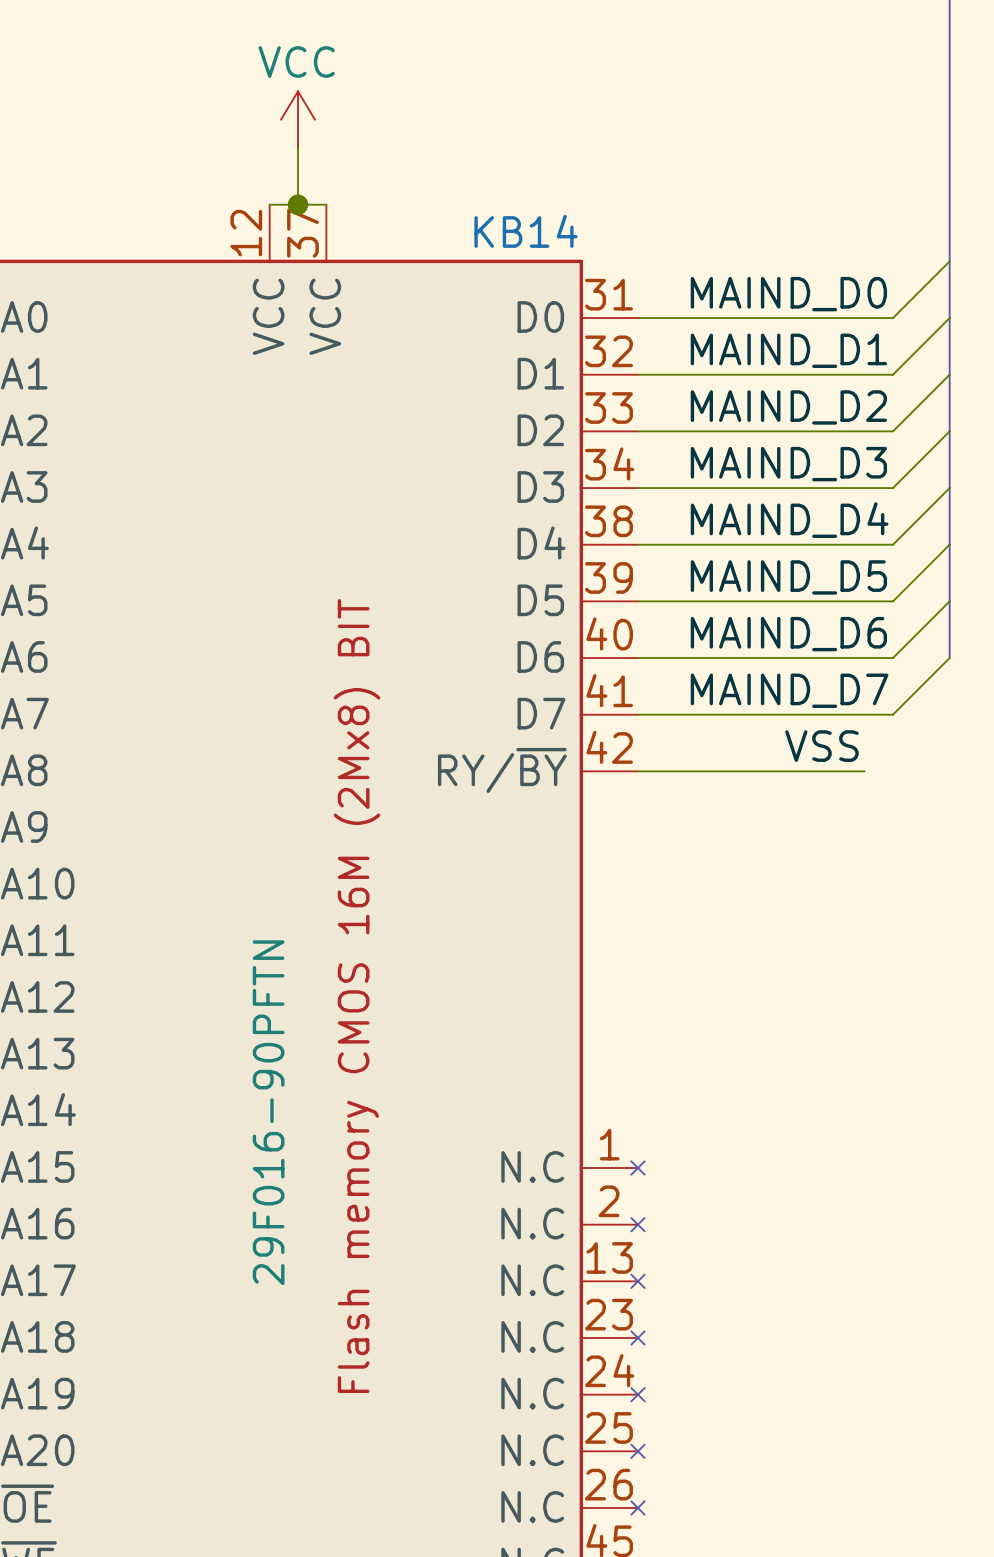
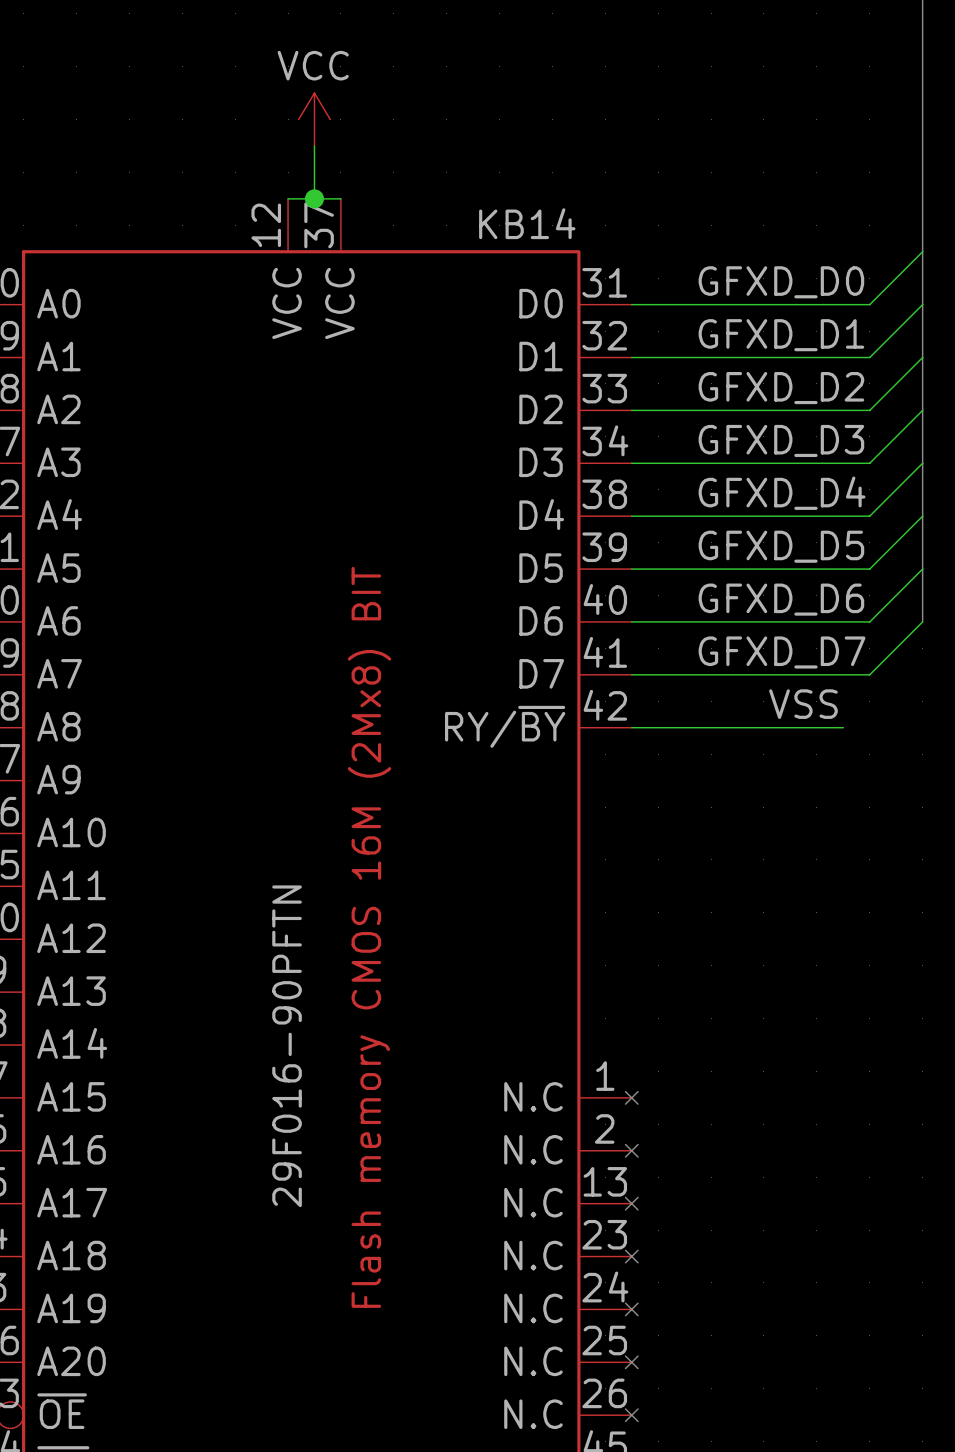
label: MAIND_D0 (788, 294) -> GFXD_D0 (781, 282)
label: MAIND_D1 (788, 350) -> GFXD_D1 (781, 335)
label: MAIND_D2 (788, 407) -> GFXD_D2 (781, 388)
label: MAIND_D3 (788, 464) -> GFXD_D3 (781, 440)
label: MAIND_D4 (789, 520) -> GFXD_D4 (782, 493)
label: MAIND_D5 (788, 577) -> GFXD_D5 (781, 546)
label: MAIND_D6 (788, 634) -> GFXD_D6 (781, 599)
label: MAIND_D7 (789, 690) -> GFXD_D7 (782, 652)

